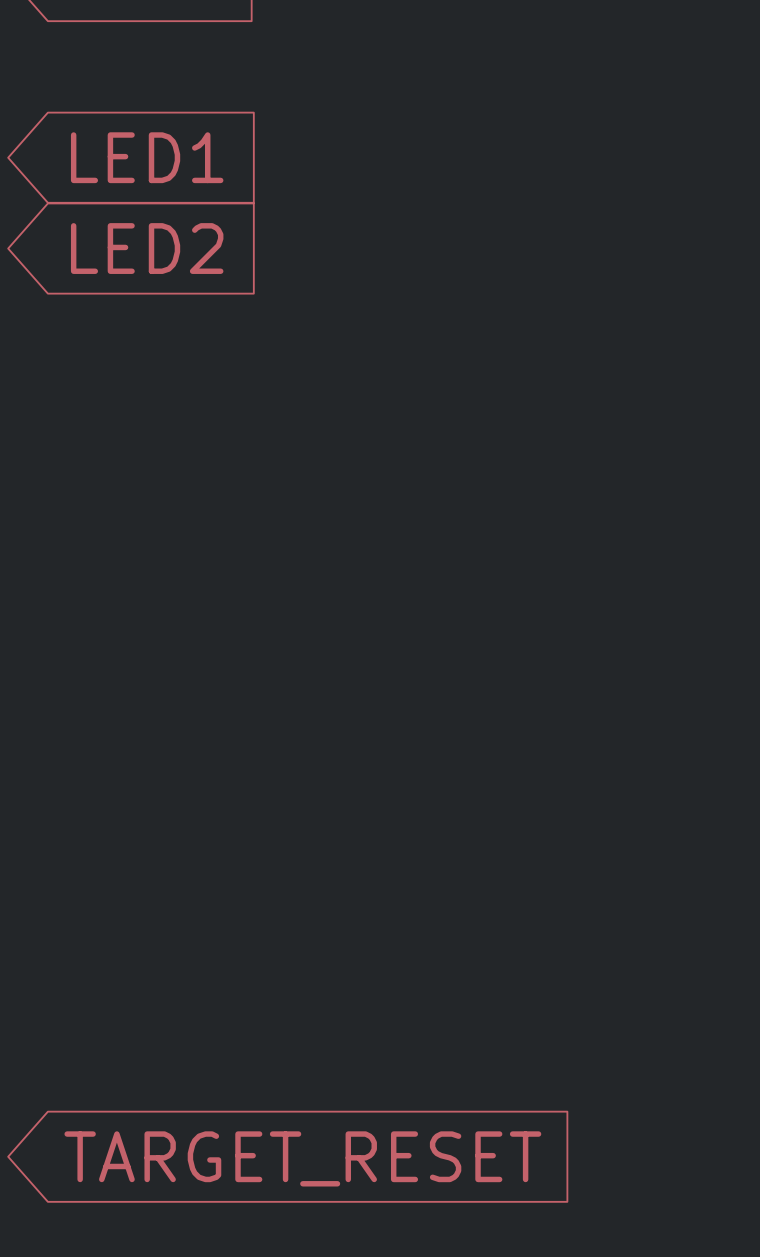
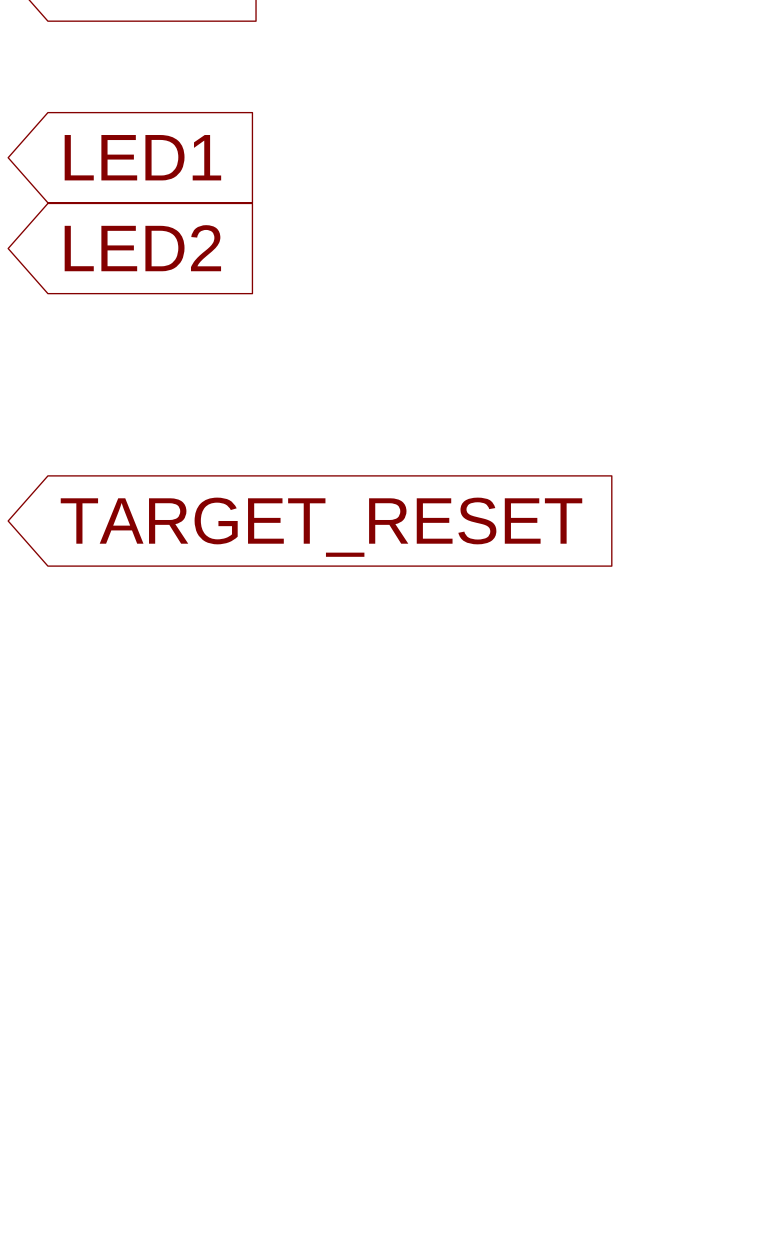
global label position: TARGET_RESET (302, 1158) -> TARGET_RESET (321, 527)

